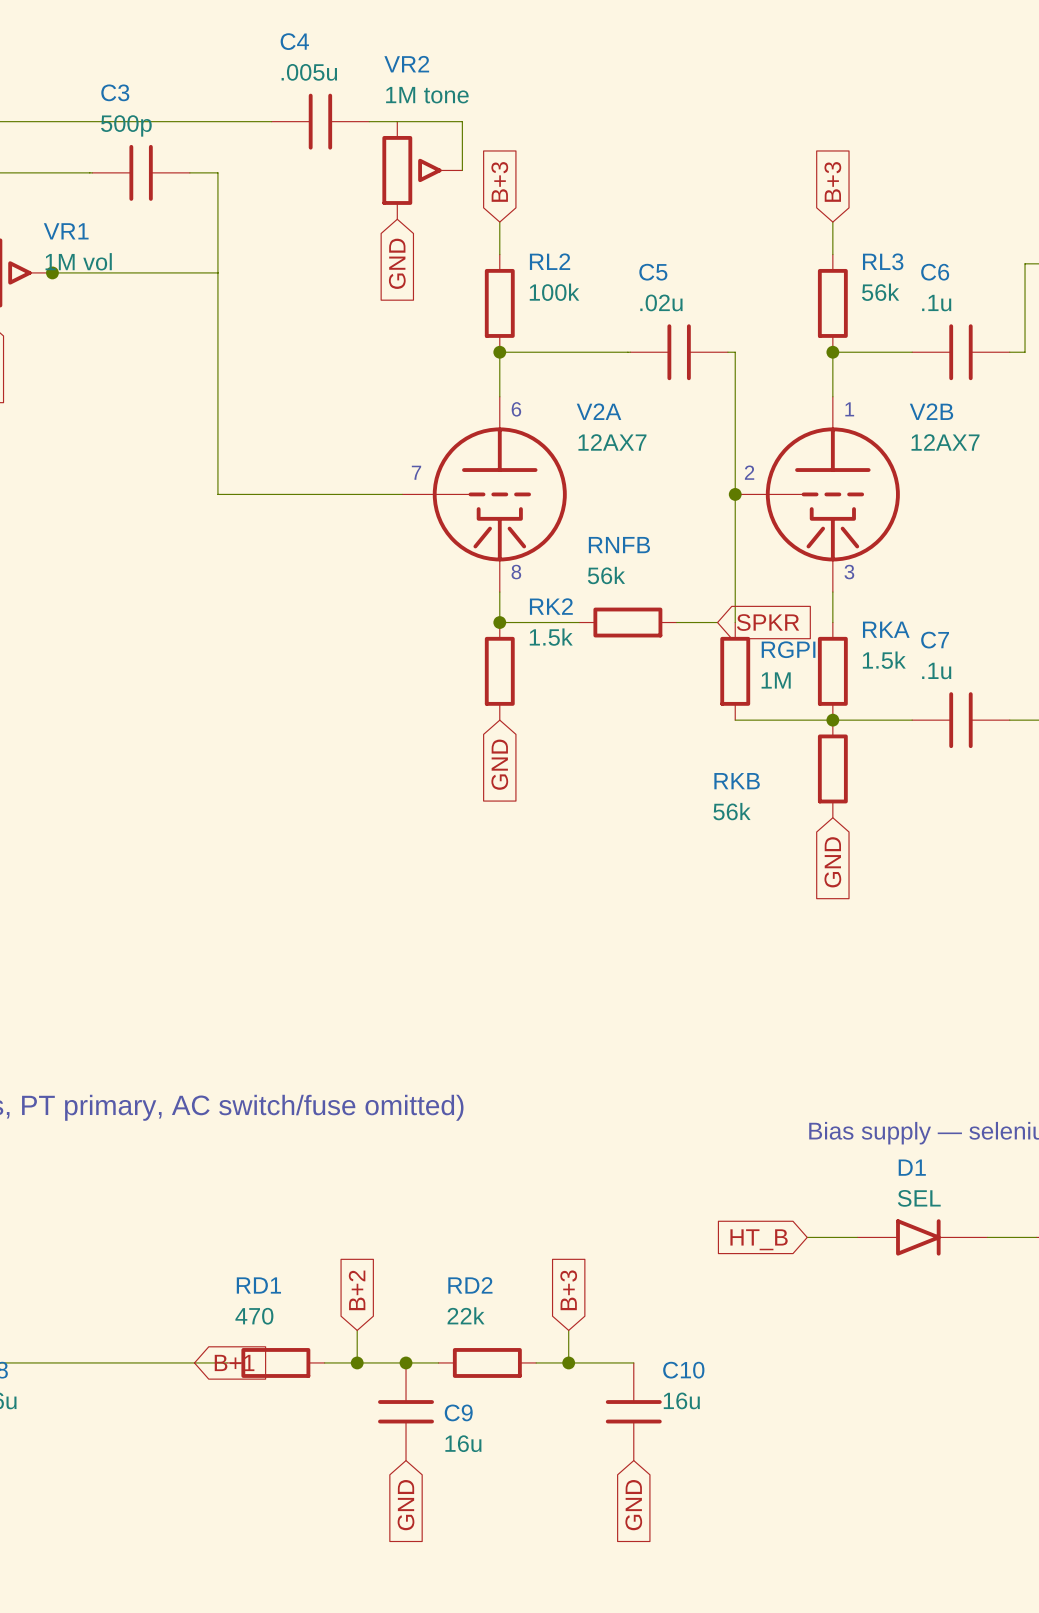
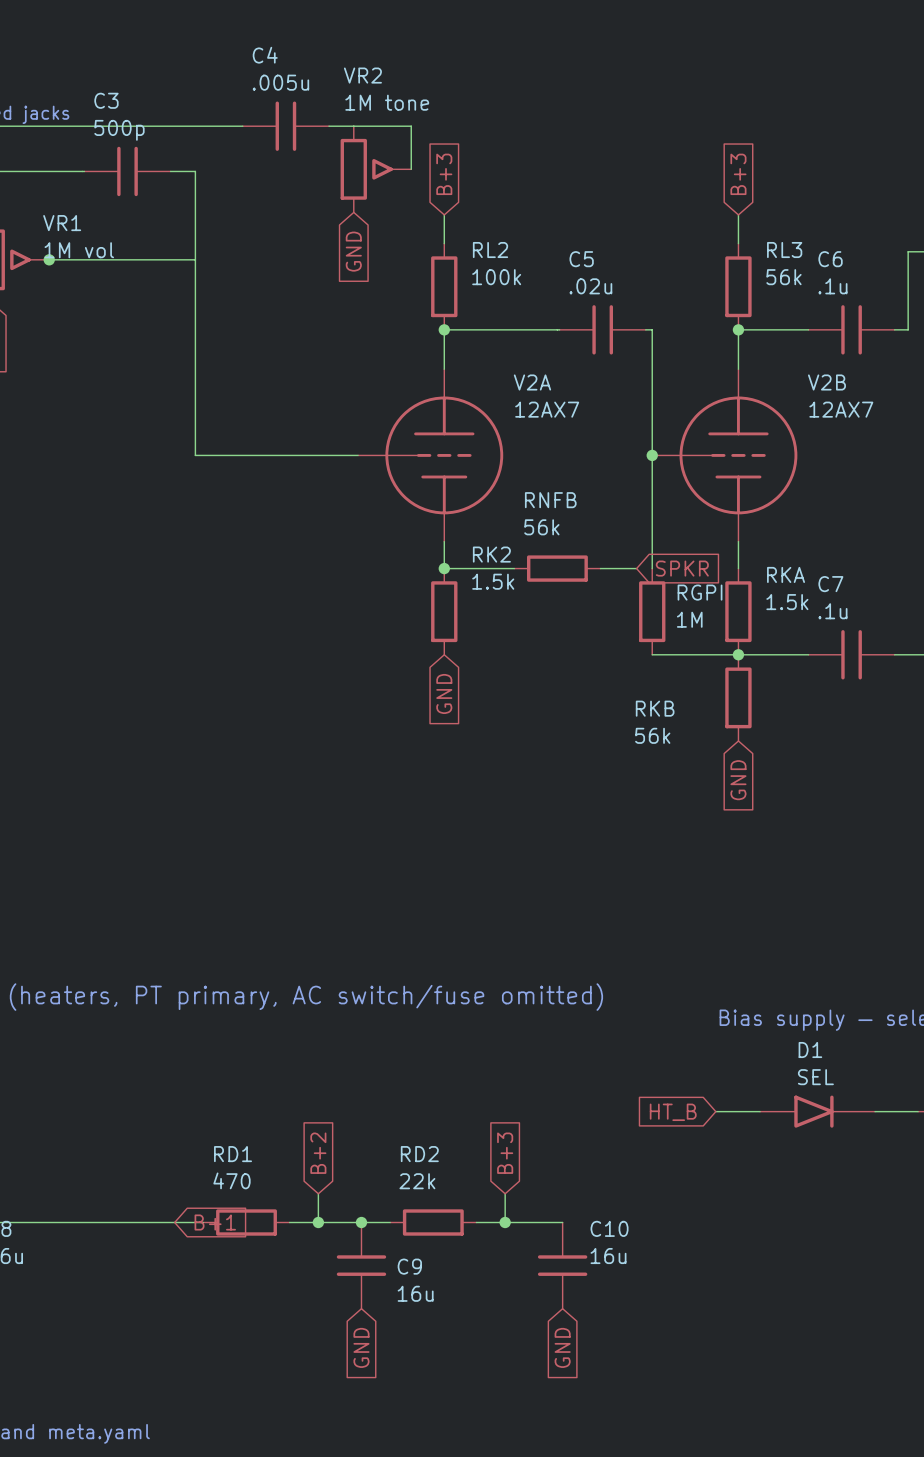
V2A symbol: [402, 396, 567, 593] -> [358, 369, 504, 542]
V2B symbol: [735, 396, 900, 593] -> [652, 369, 798, 542]
text: 6 (516, 409) -> none
text: 1 (849, 409) -> none
text: 7 (416, 472) -> none
text: 2 (749, 472) -> none
text: 8 (516, 572) -> none
text: 3 (849, 572) -> none

